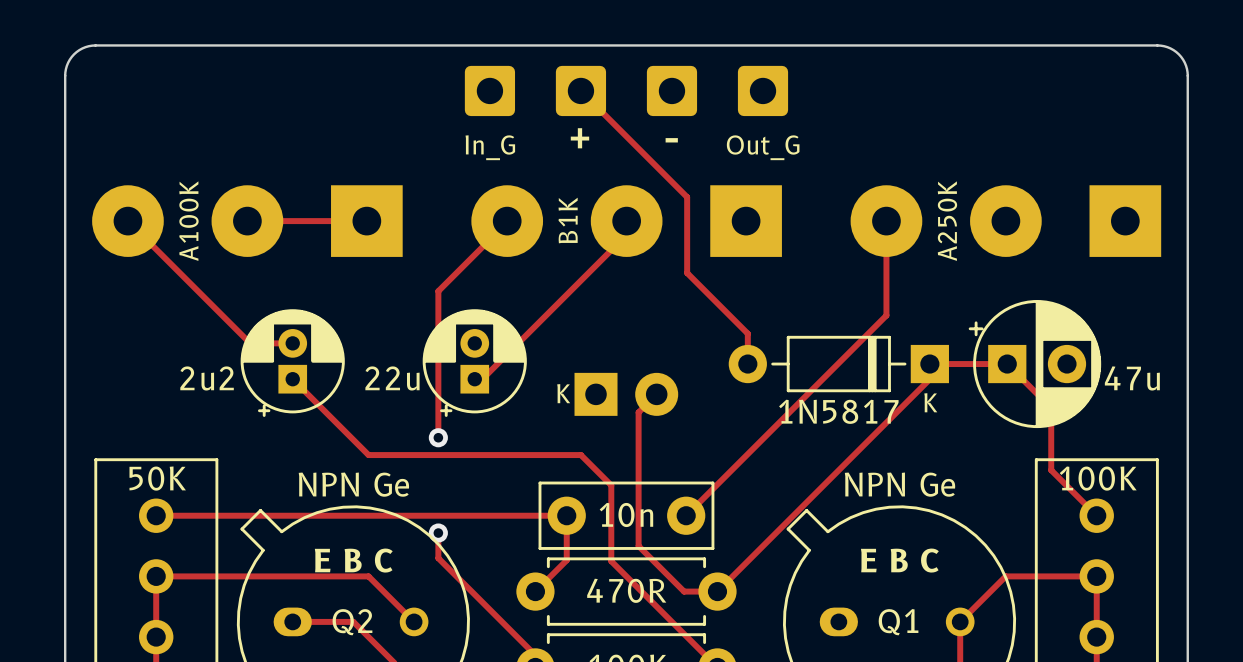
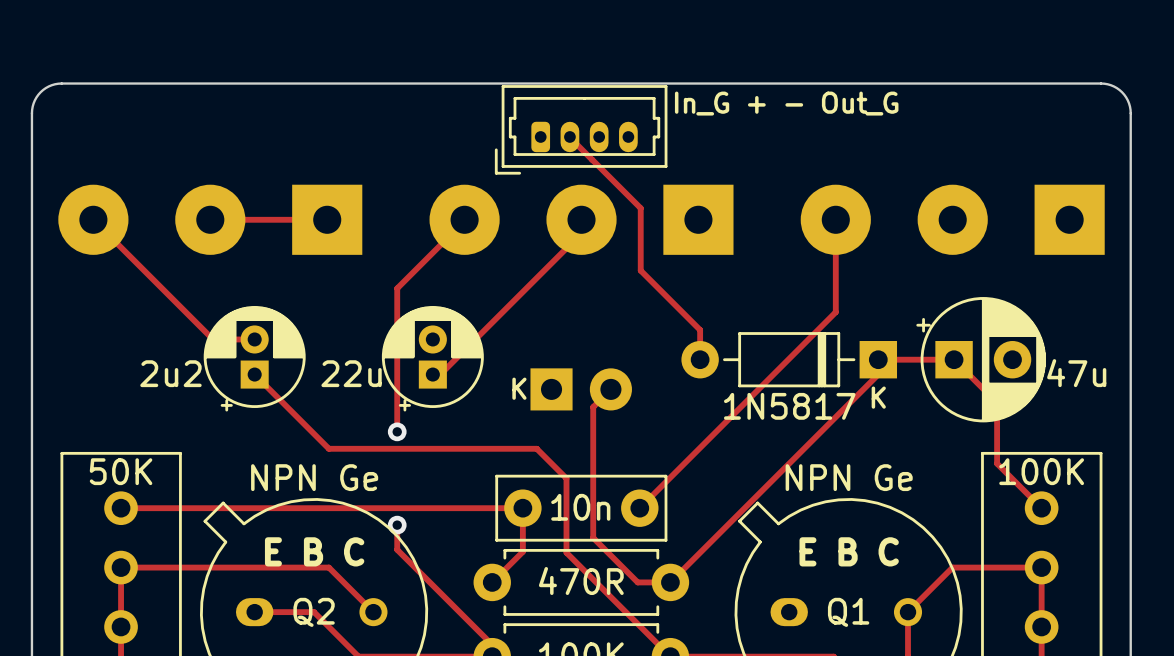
part: In_G (489, 90) -> none
track: (580, 90) (687, 197) (687, 209) -> (569, 136) (640, 208)
part: + (580, 90) -> none
part: - (671, 90) -> none
part: Out_G (763, 90) -> none
board edge: (65, 112) (65, 72) (68, 62) (79, 50) (95, 45) (1160, 45) (1176, 52) (1186, 65) (1187, 112) -> (31, 113) (34, 100) (40, 92) (48, 86) (61, 83) (1101, 83) (1113, 86) (1122, 92) (1127, 100) (1130, 113)
part: none -> (581, 129)
part value: B1K (568, 220) -> none
part value: A100K (188, 221) -> none
part value: A250K (947, 221) -> none

